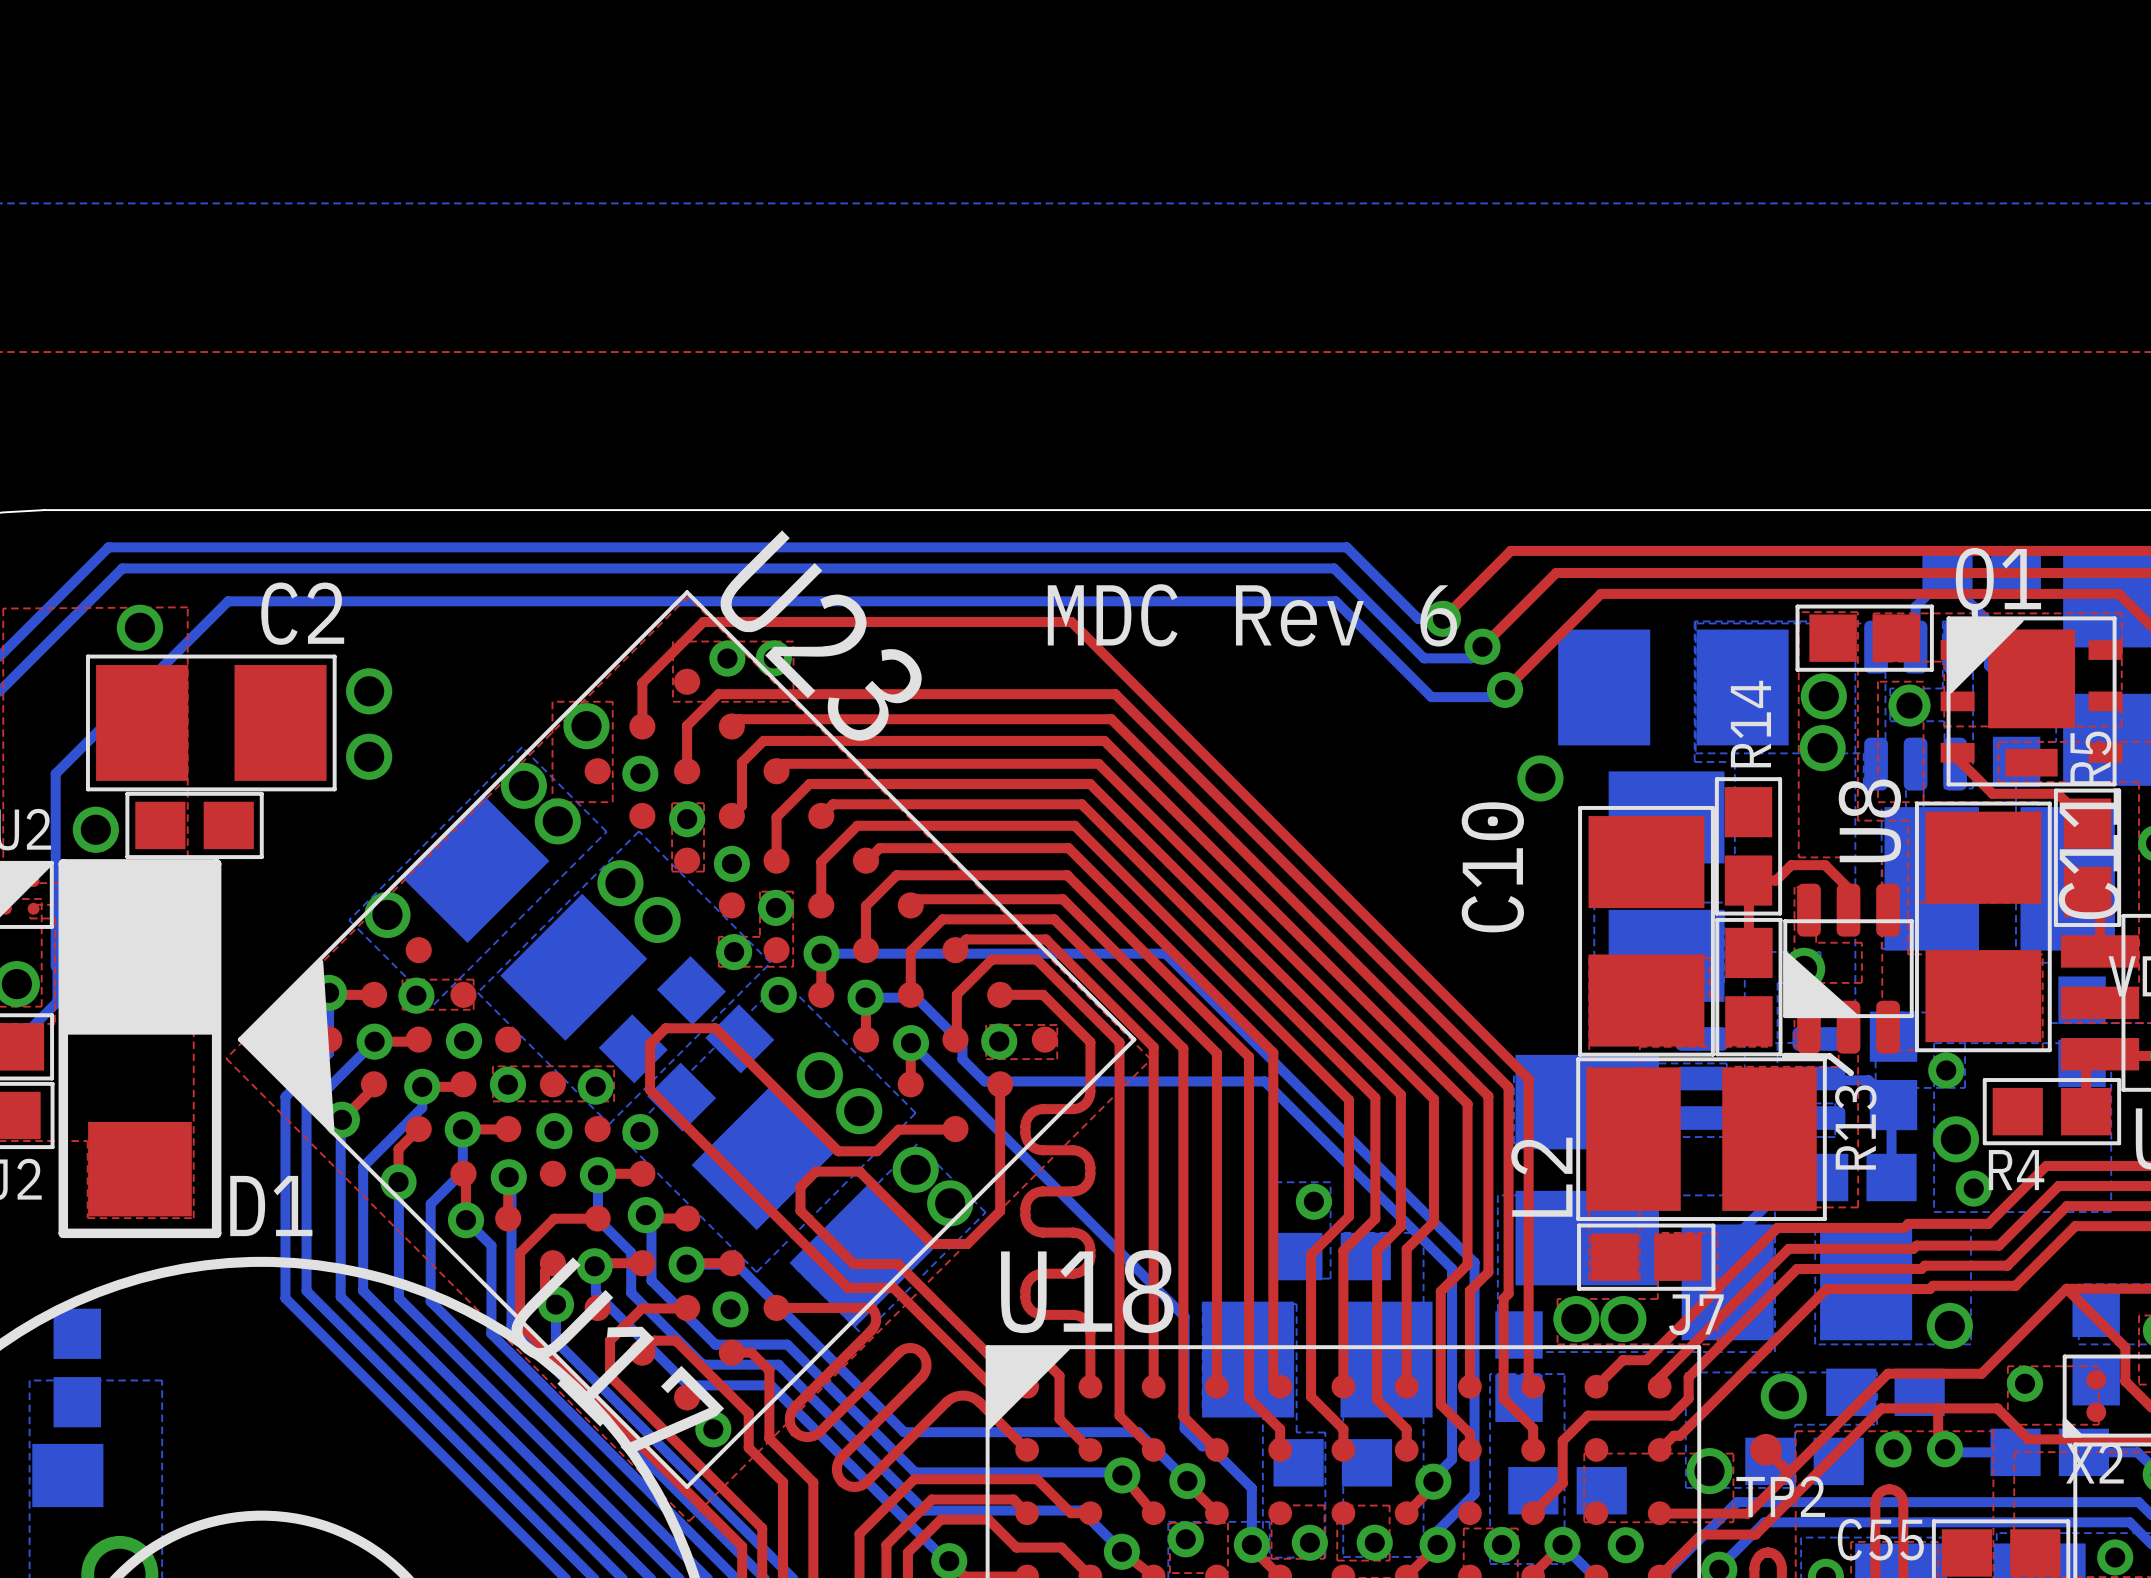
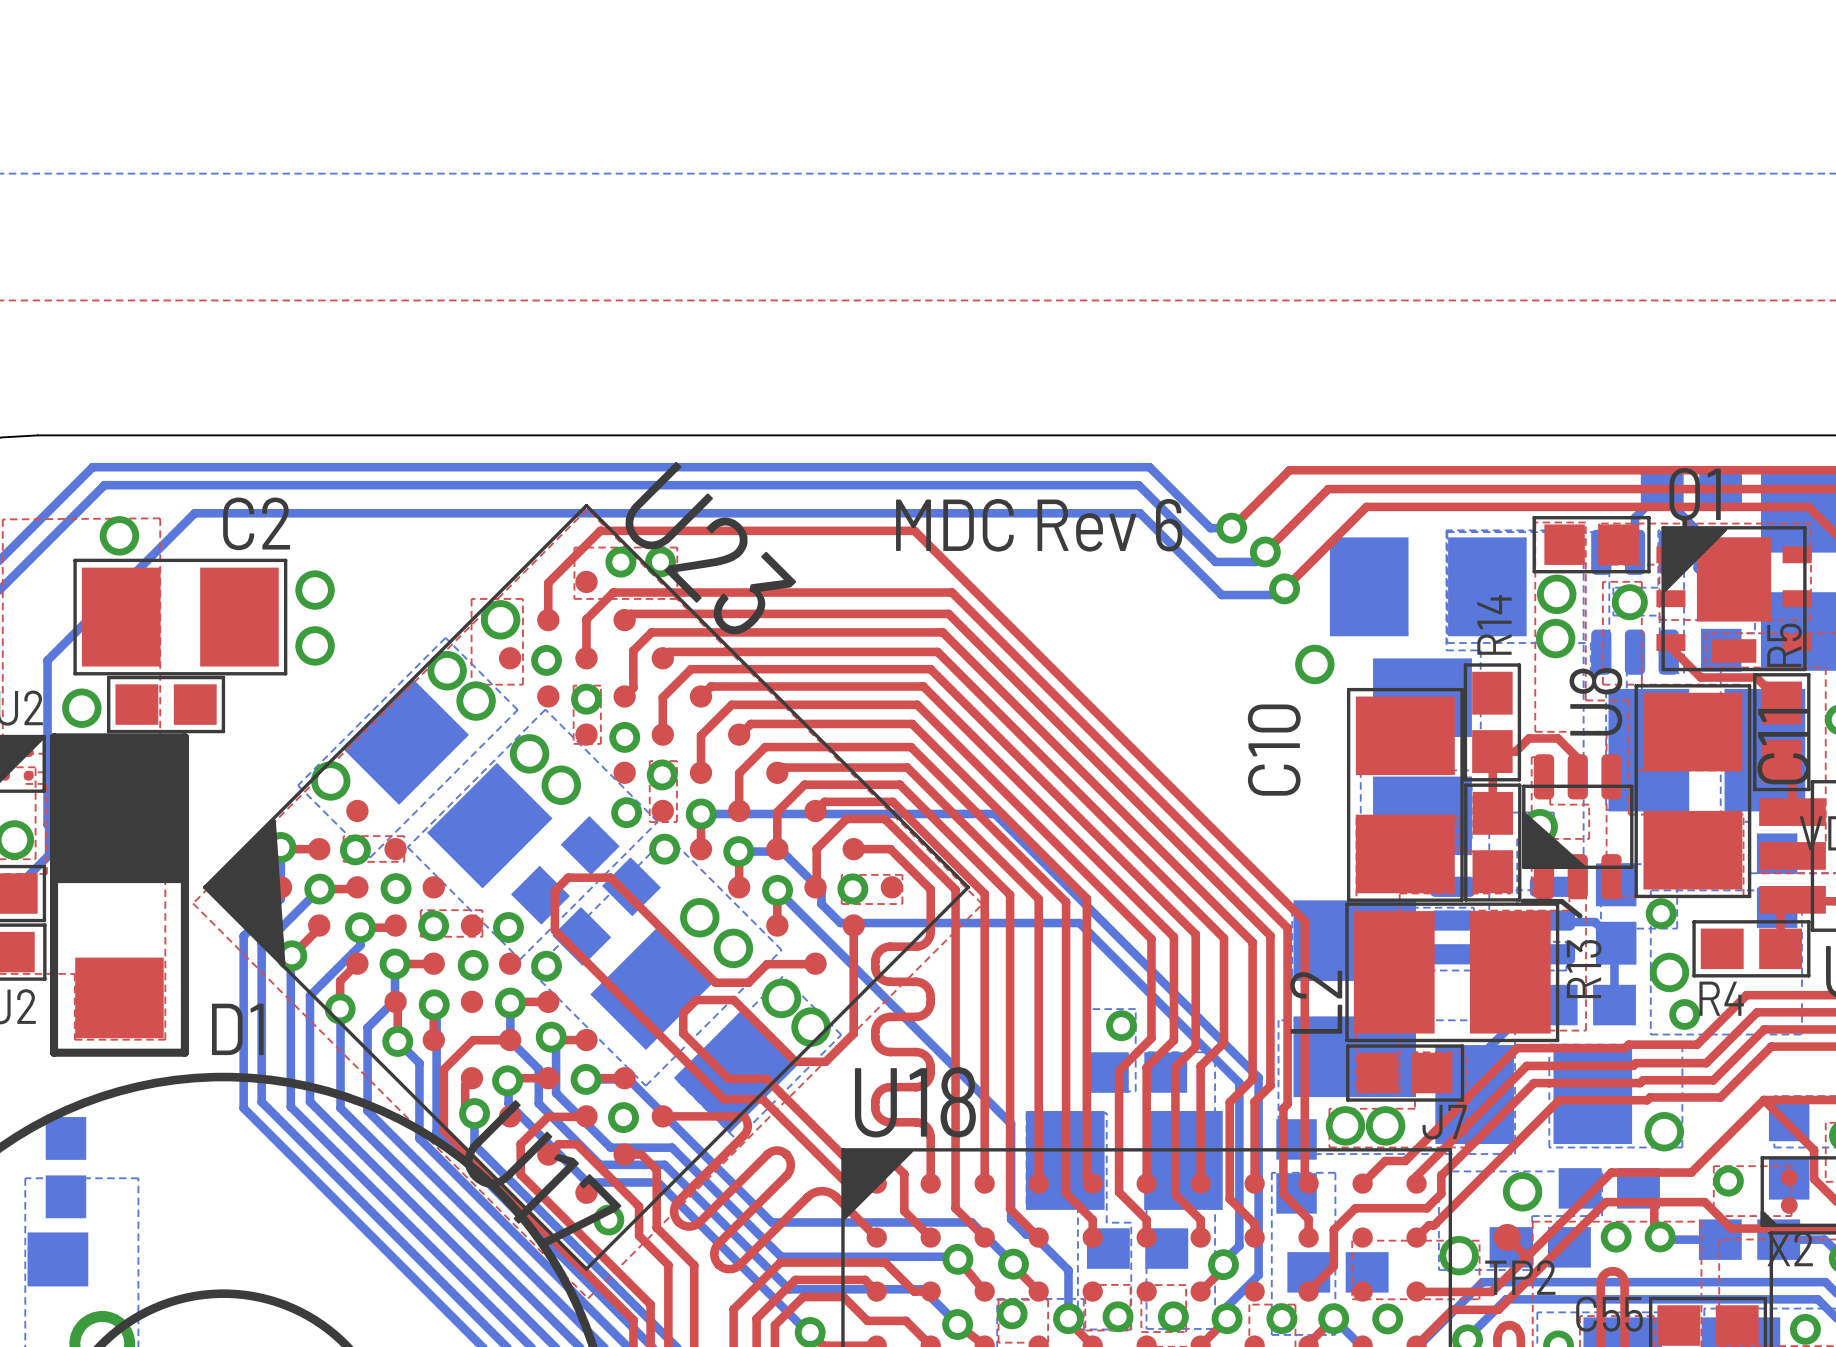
top zone outline: (759, 891) (759, 936) (718, 936) (718, 966) (793, 966) (793, 963) -> (649, 761) (649, 822) (676, 822)
top zone outline: (565, 1066) (614, 1066) (614, 1101) (492, 1101) (492, 1097) -> (482, 910) (482, 936) (420, 936)

